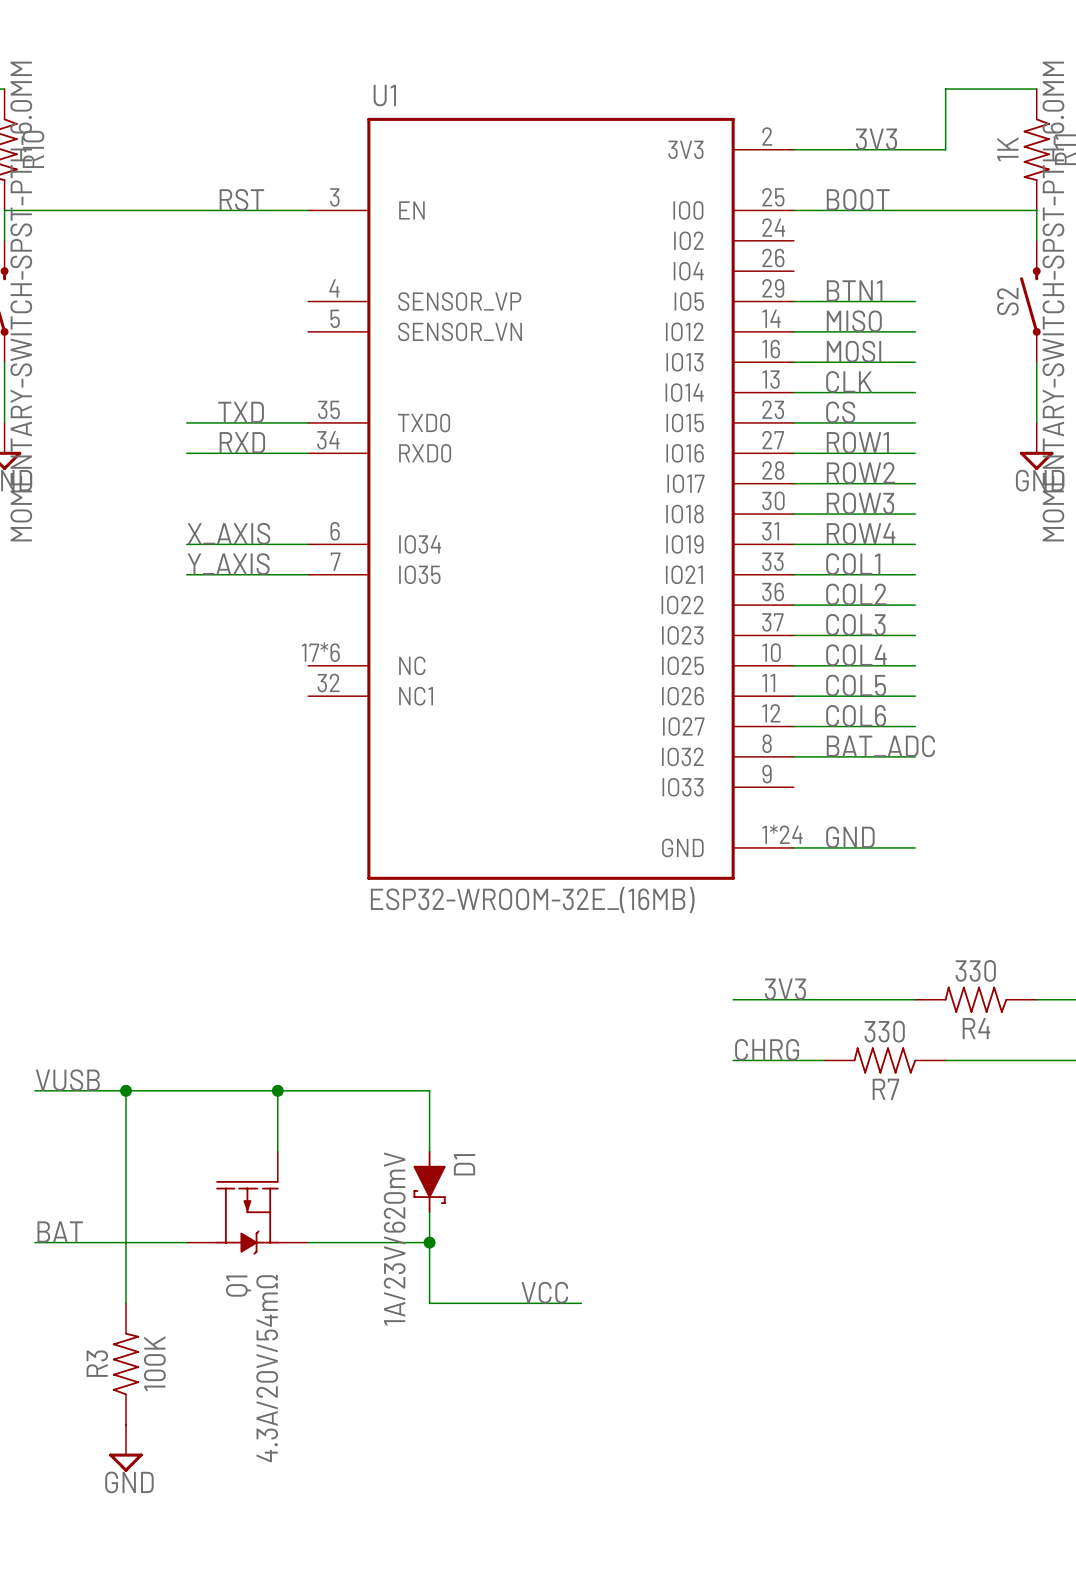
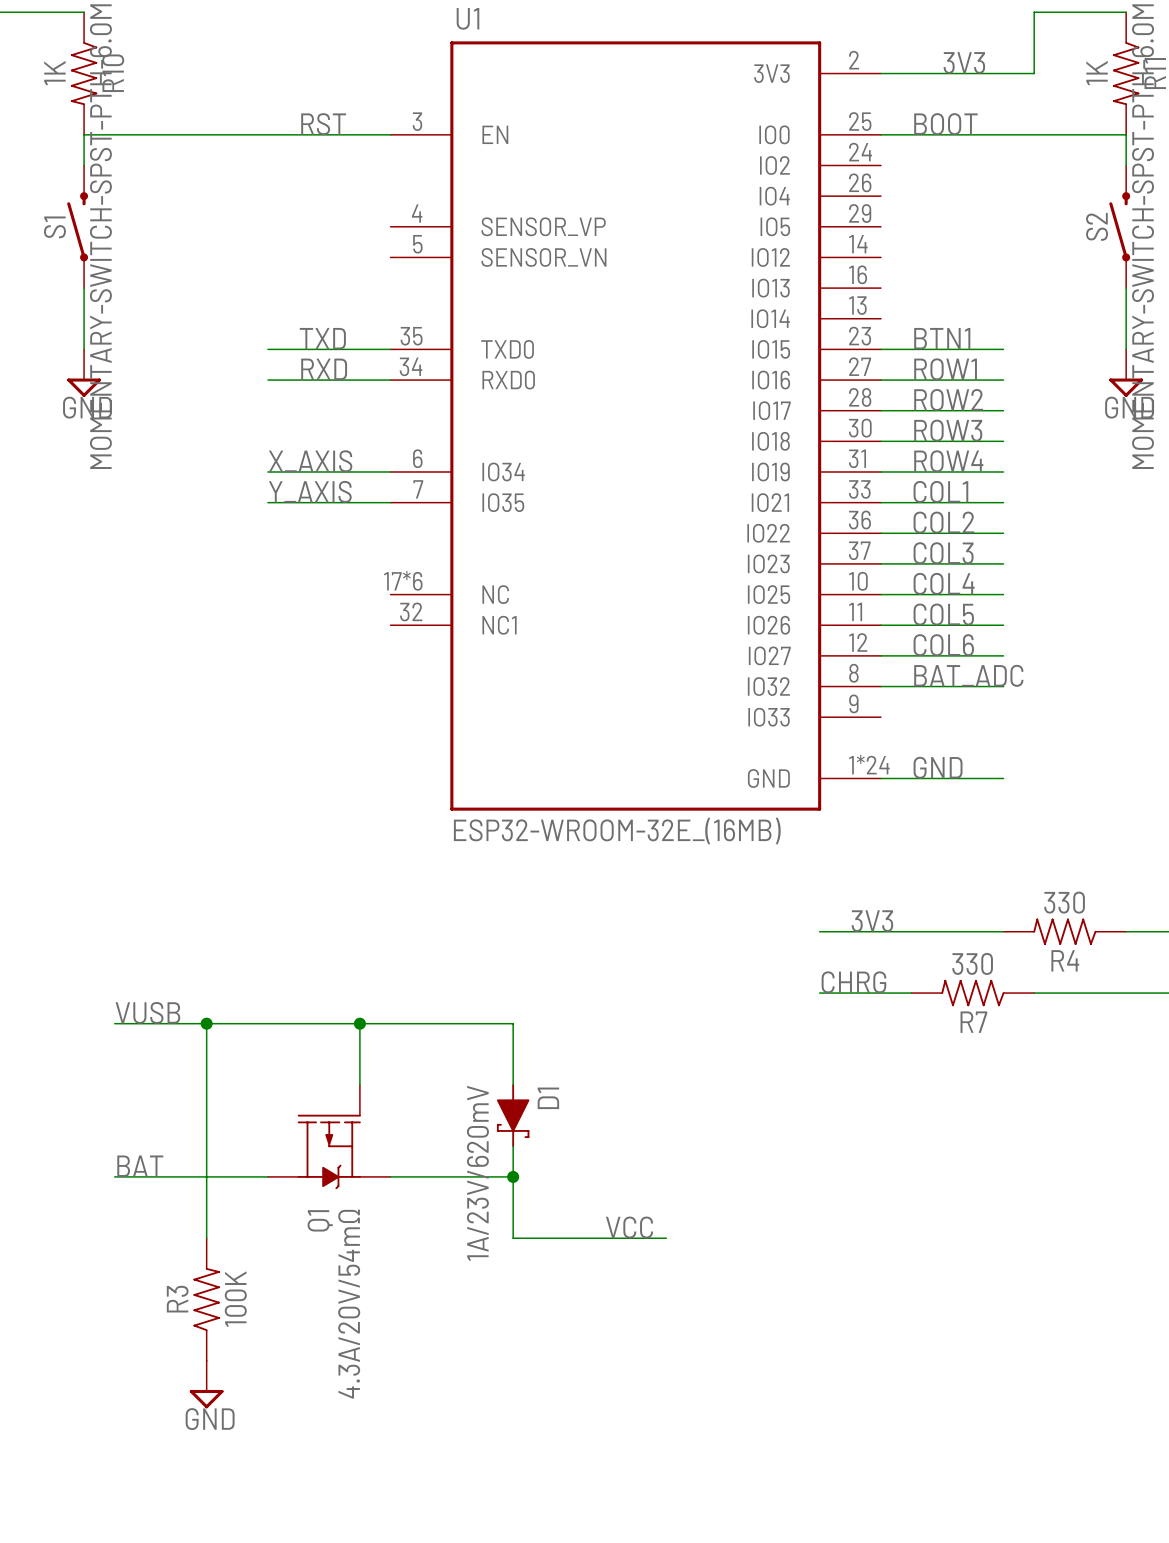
label: BTN1 (854, 290) -> none
wire: (793, 301) (915, 301) -> none
label: MISO (854, 321) -> none
wire: (793, 331) (915, 331) -> none
label: MOSI (854, 351) -> none
wire: (793, 362) (915, 362) -> none
label: CLK (849, 381) -> none
wire: (793, 392) (915, 392) -> none
label: CS (840, 412) -> BTN1 (942, 338)

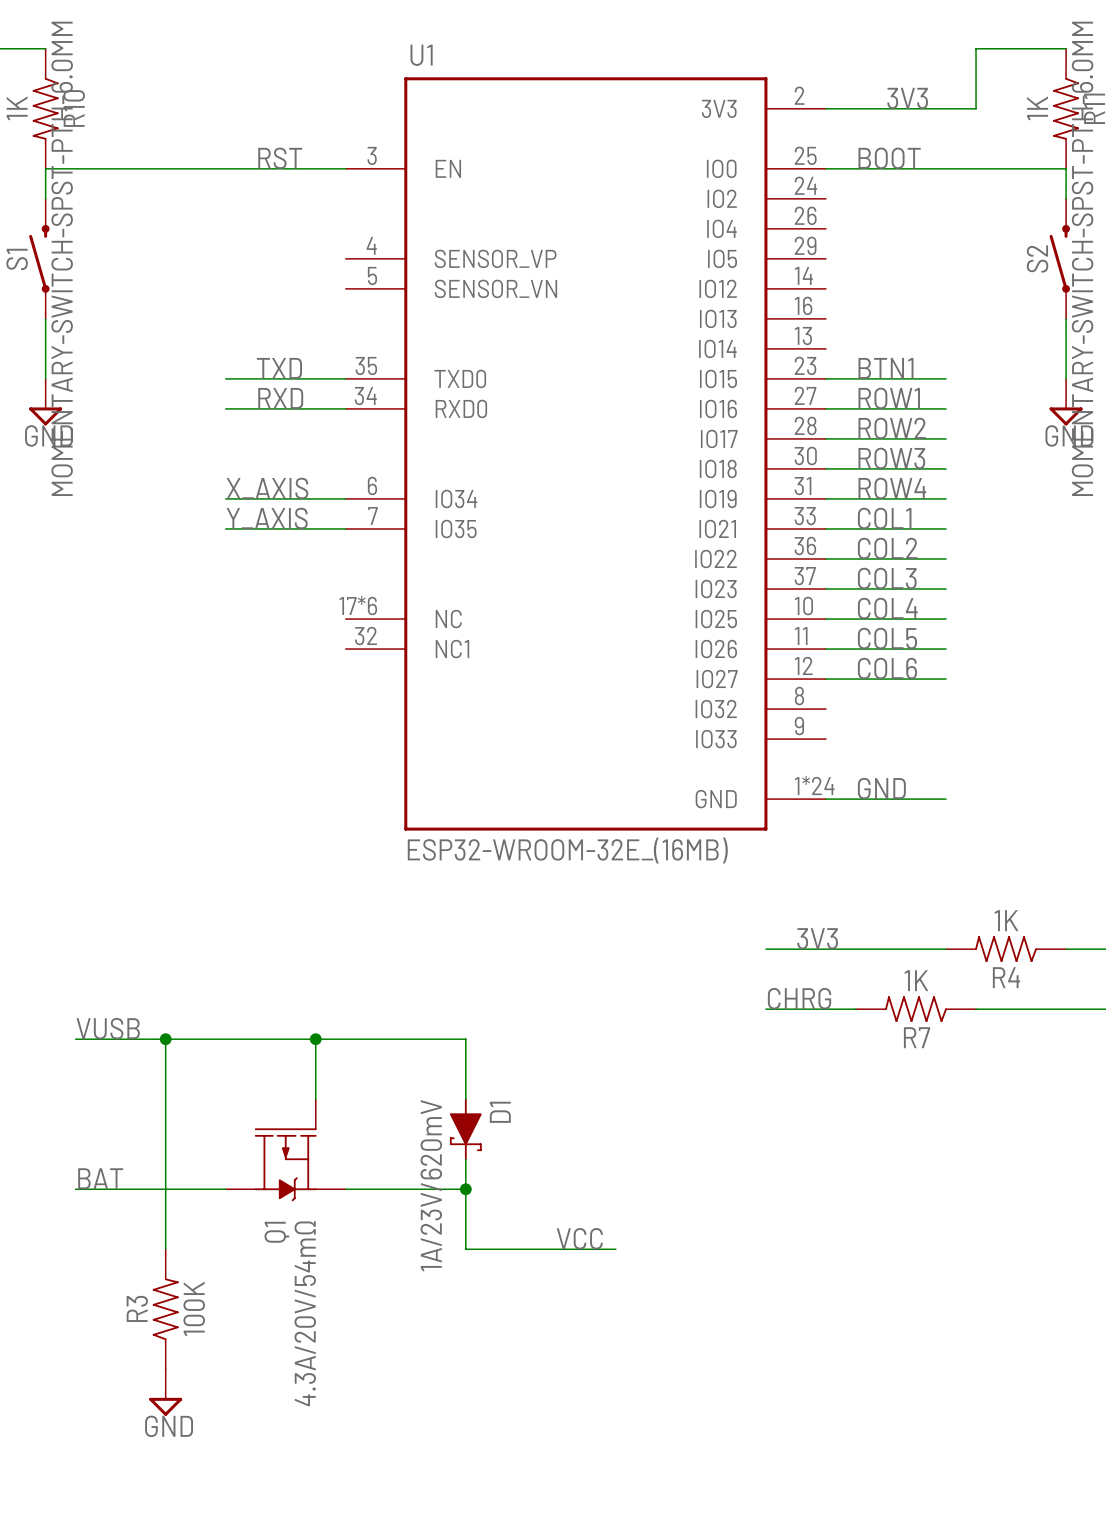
label: BAT_ADC (968, 675) -> none
wire: (880, 686) (1003, 686) -> none
R4 value: 330 (1064, 902) -> 1K (1006, 920)
R7 value: 330 (972, 963) -> 1K (916, 980)

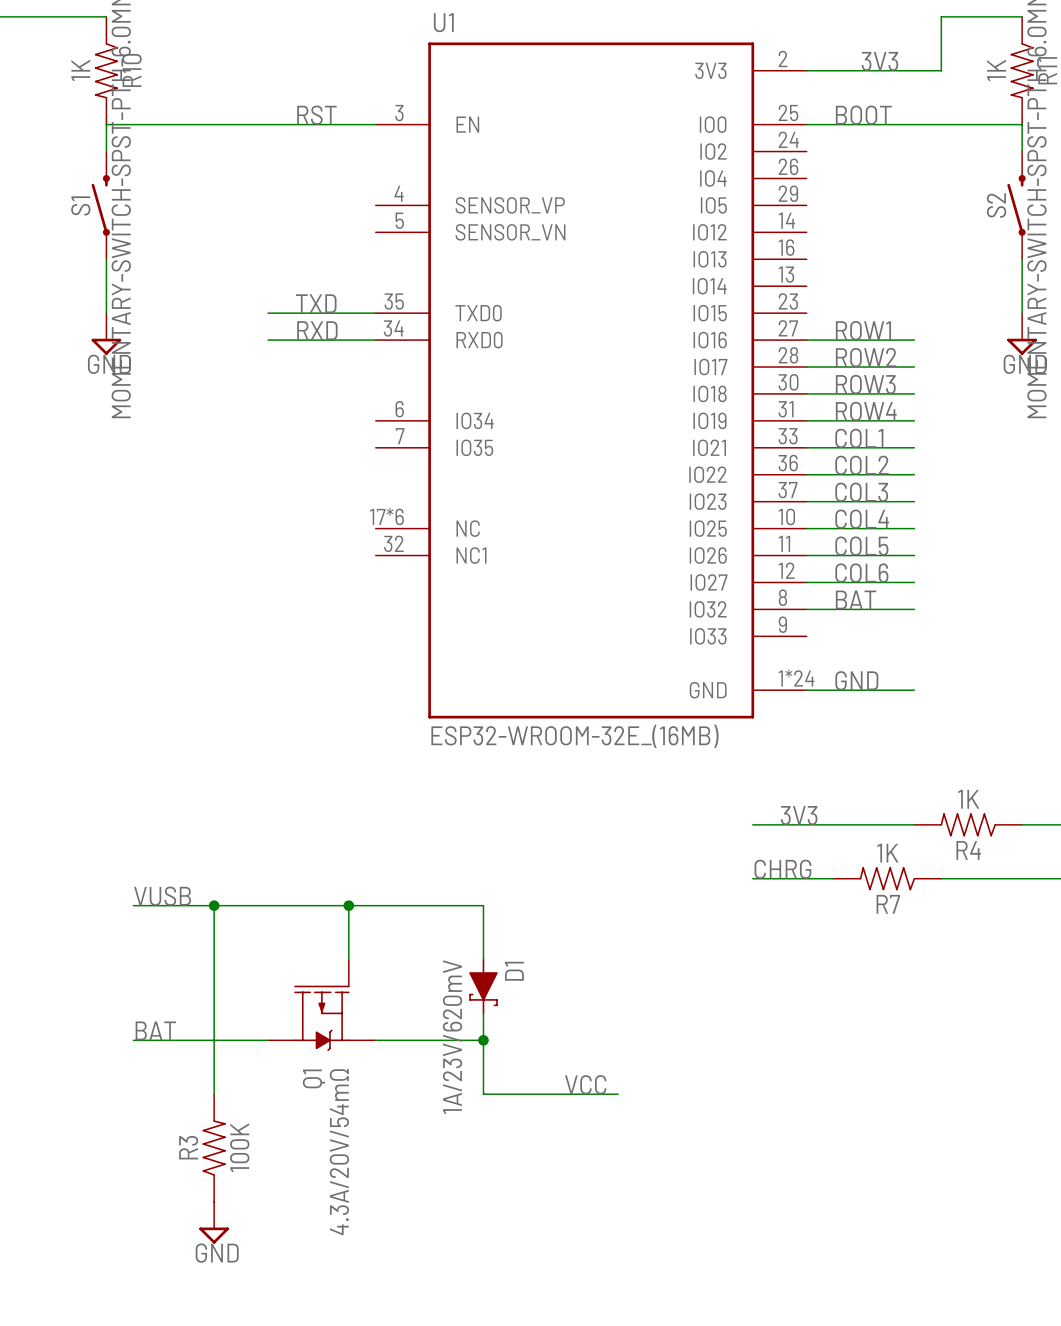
label: BTN1 (885, 368) -> none
wire: (825, 378) (946, 378) -> none
label: X_AXIS (267, 488) -> none
wire: (225, 498) (345, 498) -> none
label: Y_AXIS (267, 518) -> none
wire: (225, 528) (345, 528) -> none
label: none -> BAT (856, 599)
wire: none -> (806, 609) (914, 609)

